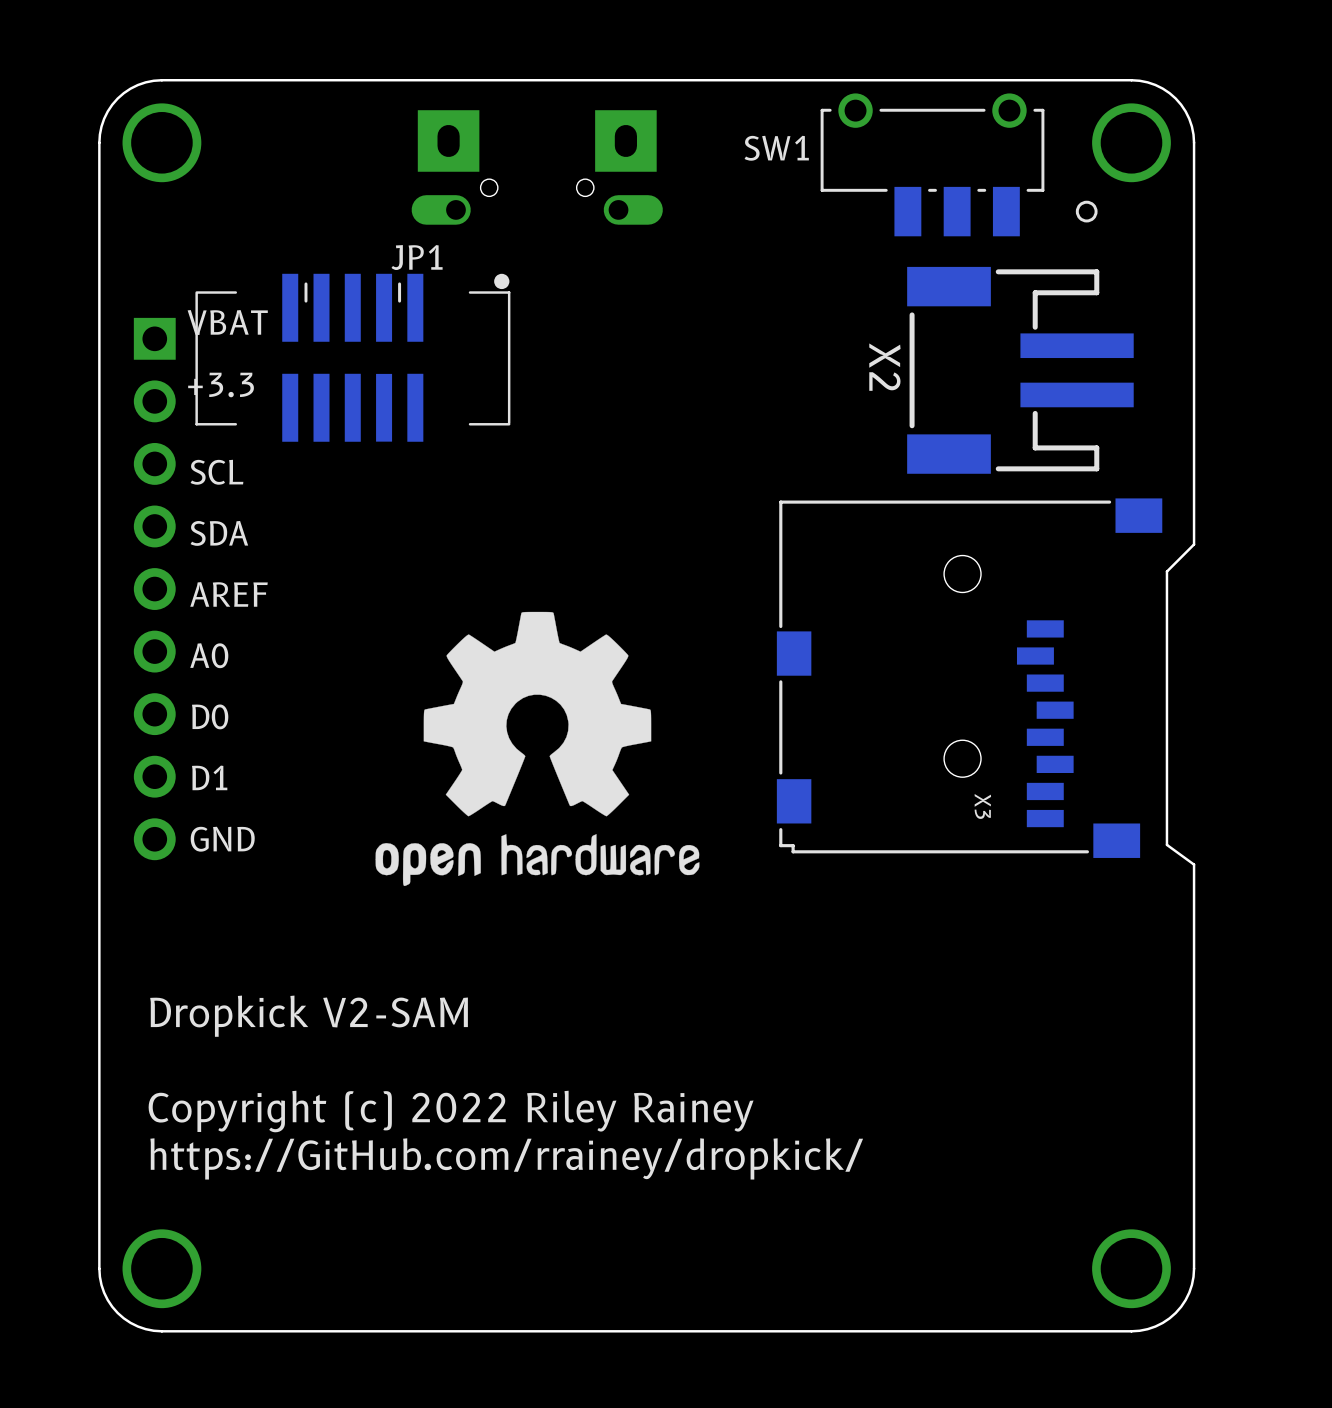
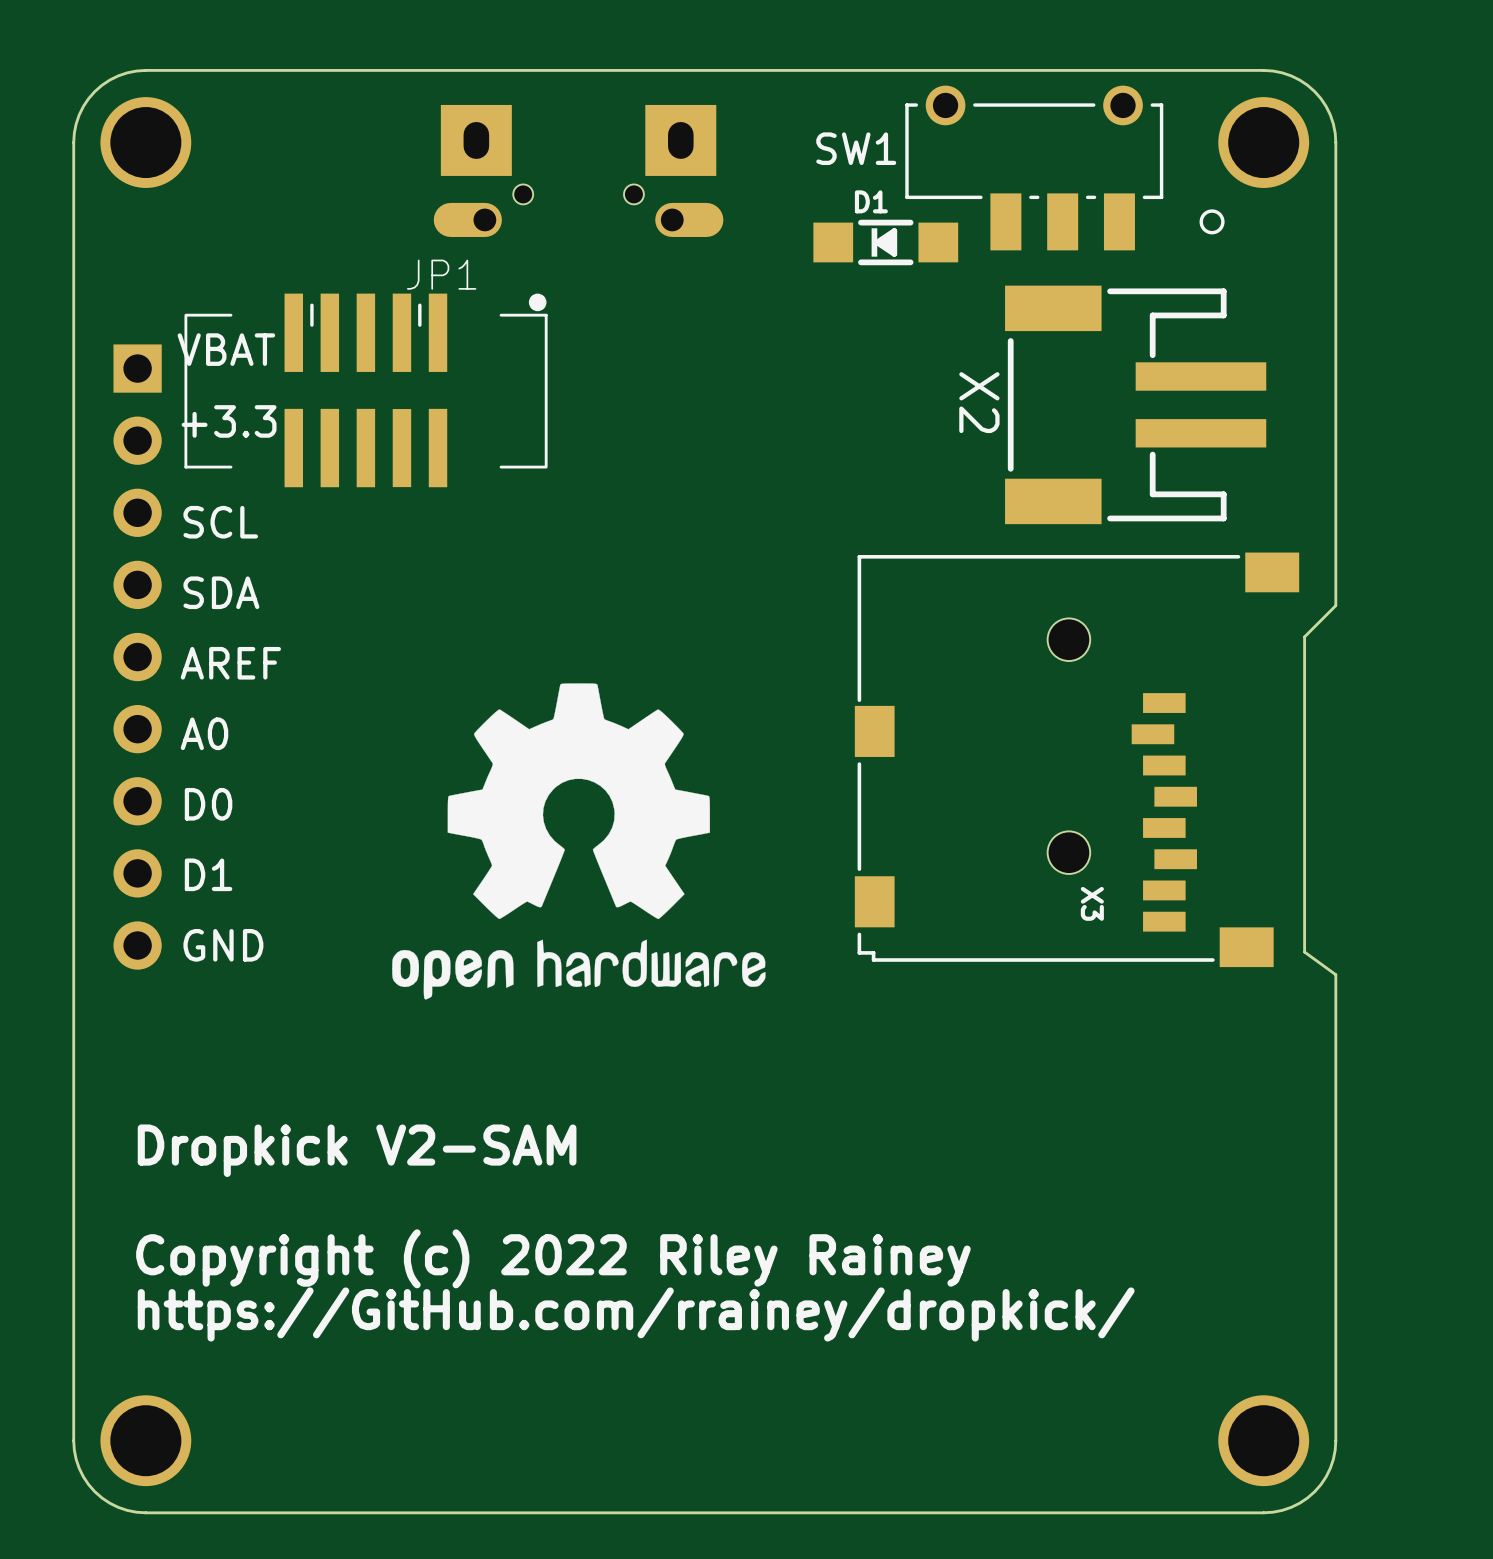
D1: none -> (885, 242)

